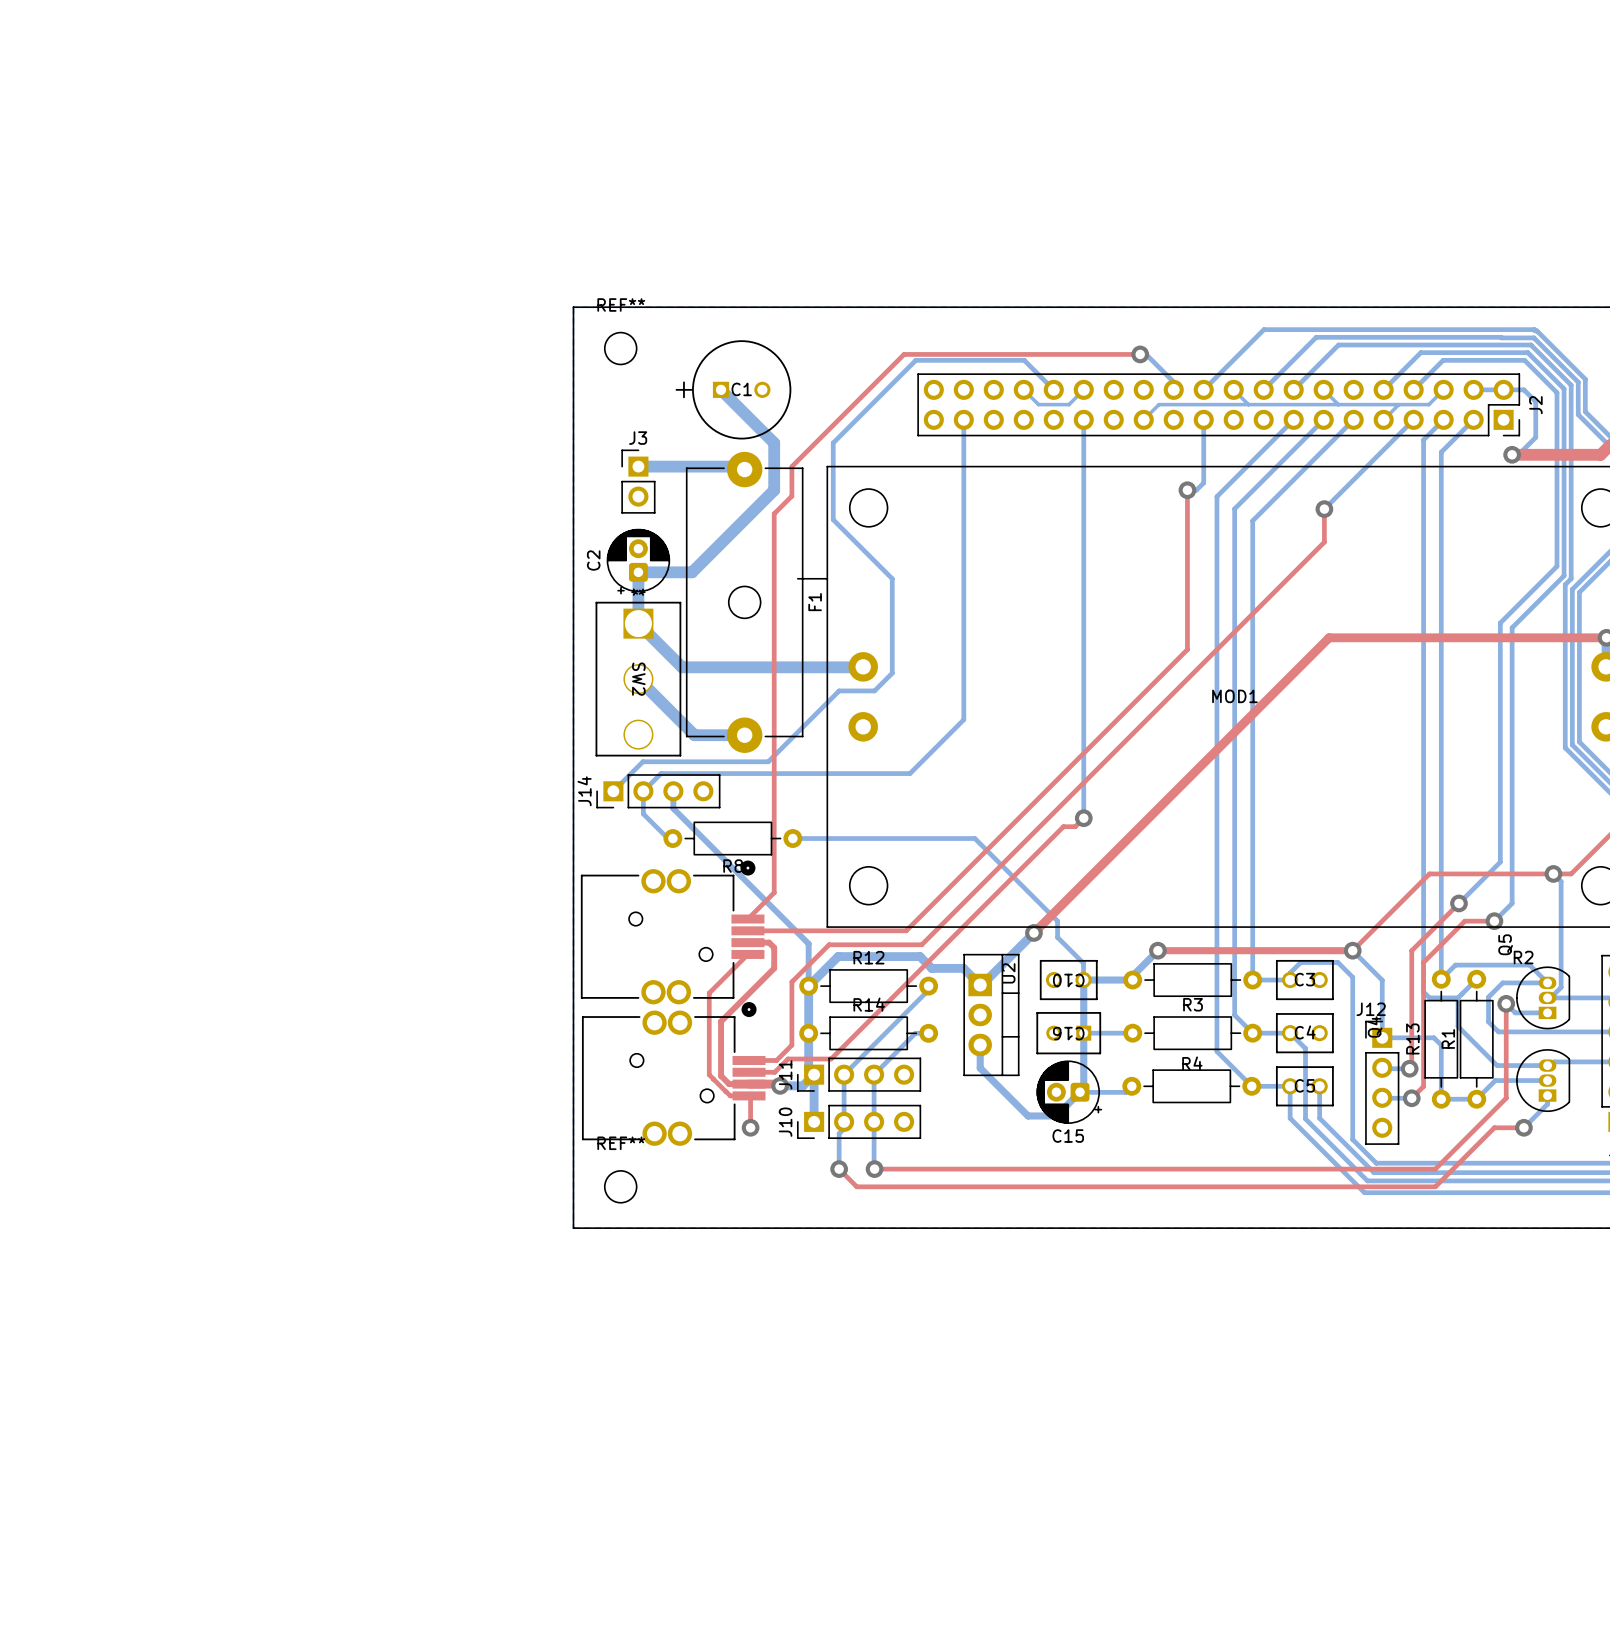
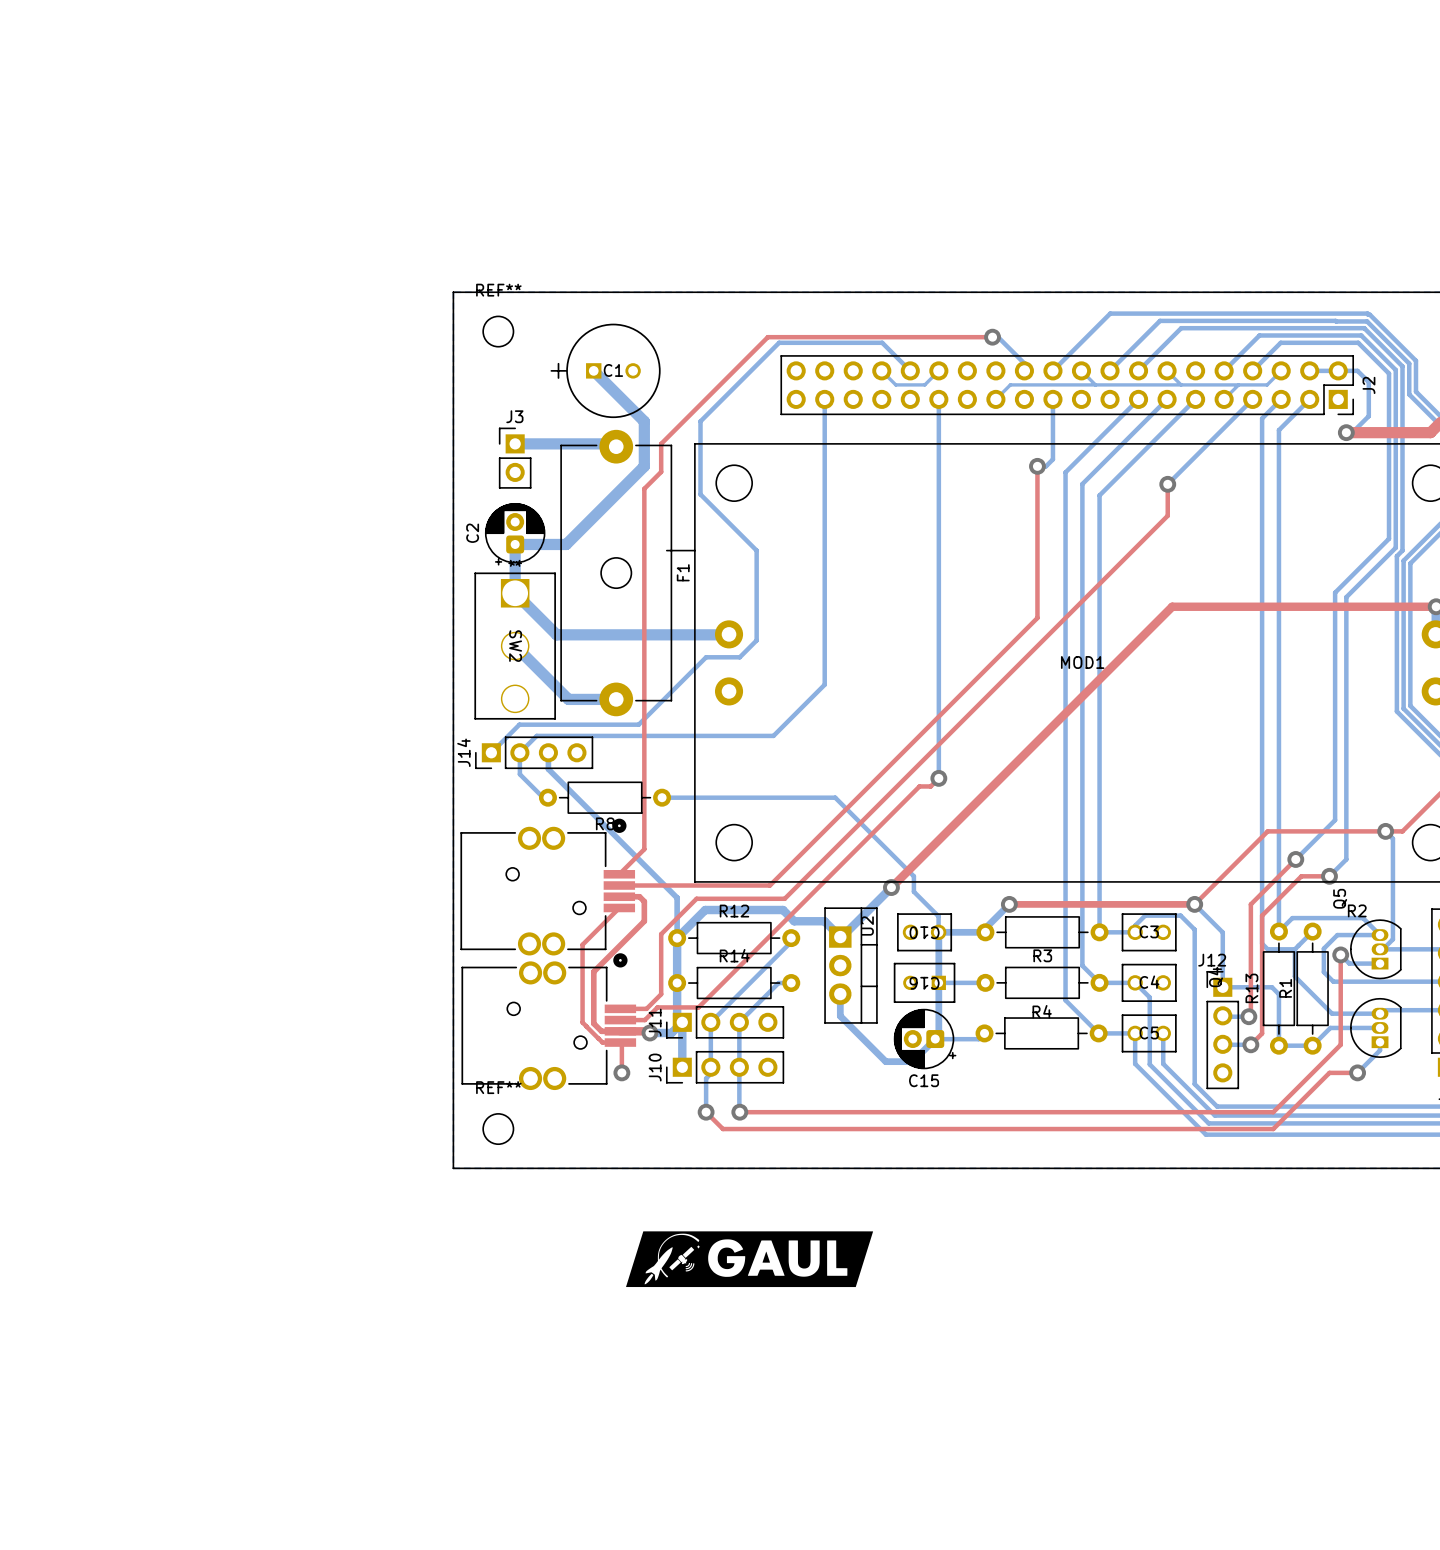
drawing: none -> [626, 1231, 874, 1288]

